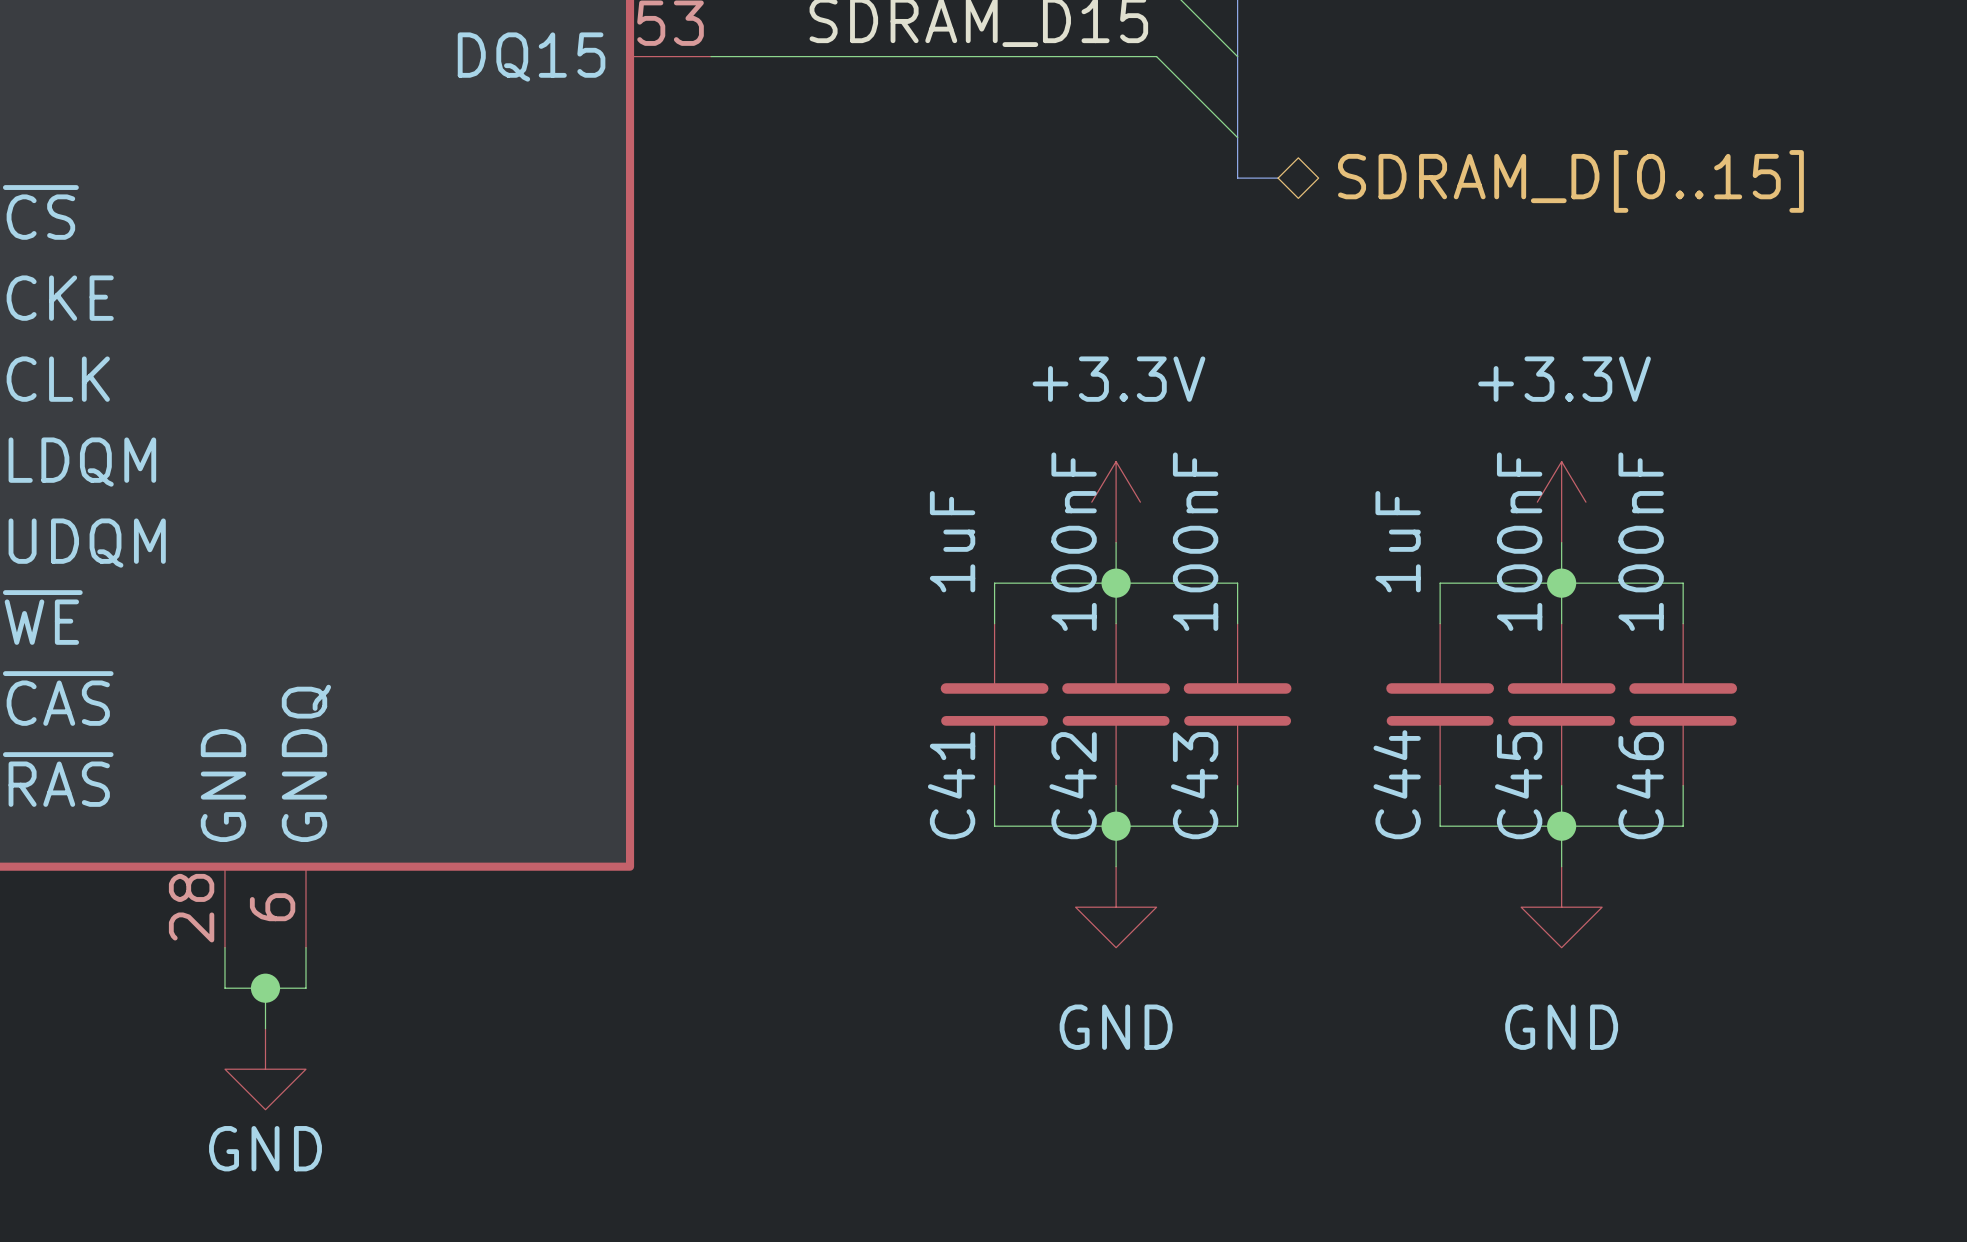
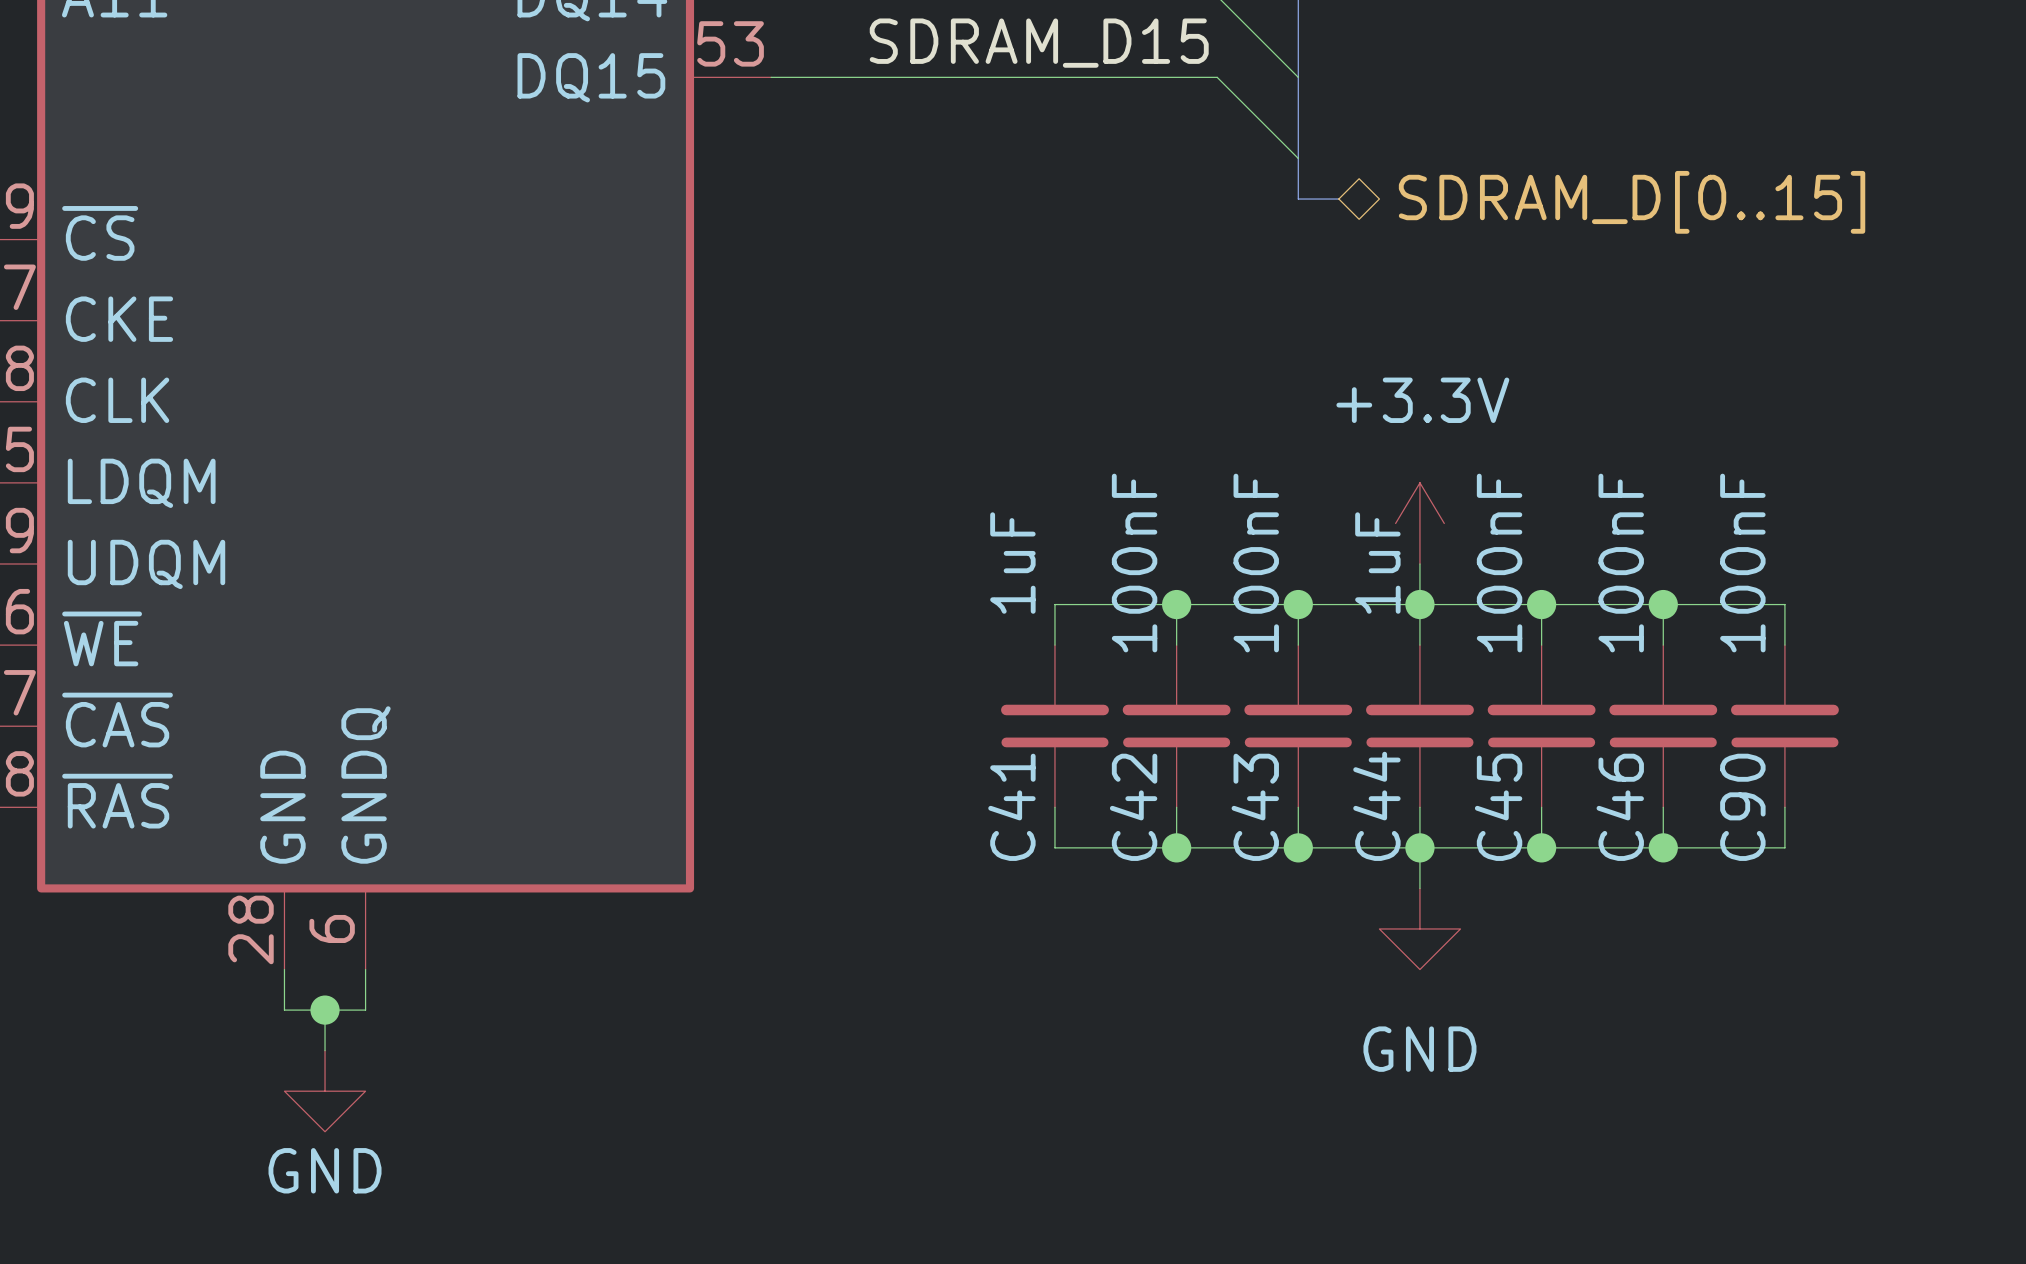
power symbol: +3.3V (1116, 502) -> none
power symbol: none -> +3.3V (1419, 523)
power symbol: +3.3V (1561, 502) -> none
wire: (1116, 542) (1116, 583) -> (1541, 604) (1541, 645)
wire: (1561, 542) (1561, 623) -> (1419, 564) (1419, 645)
junction: none -> (1298, 604)
junction: none -> (1419, 604)
wire: (1440, 583) (1440, 623) -> (1501, 604) (1298, 604)
junction: none -> (1541, 604)
junction: (1561, 583) -> none
wire: none -> (1663, 604) (1663, 645)
junction: none -> (1663, 604)
wire: (1683, 583) (1683, 623) -> (1744, 604) (1784, 604) (1784, 645)
C44 position: (1440, 704) -> (1419, 726)
C45 position: (1561, 704) -> (1541, 726)
C46 position: (1683, 704) -> (1663, 726)
C90: none -> 100nF (1784, 726)
wire: (1440, 785) (1440, 826) -> (1298, 847) (1501, 847)
wire: (1561, 785) (1561, 866) -> (1419, 807) (1419, 888)
wire: none -> (1663, 807) (1663, 847)
wire: (1683, 785) (1683, 826) -> (1784, 807) (1784, 847) (1744, 847)
wire: (1116, 826) (1116, 866) -> (1541, 807) (1541, 847)
junction: none -> (1298, 847)
junction: none -> (1419, 847)
junction: none -> (1541, 847)
junction: (1561, 826) -> none
junction: none -> (1663, 847)
power symbol: GND (1116, 907) -> none
power symbol: none -> GND (1419, 928)
power symbol: GND (1561, 907) -> none

